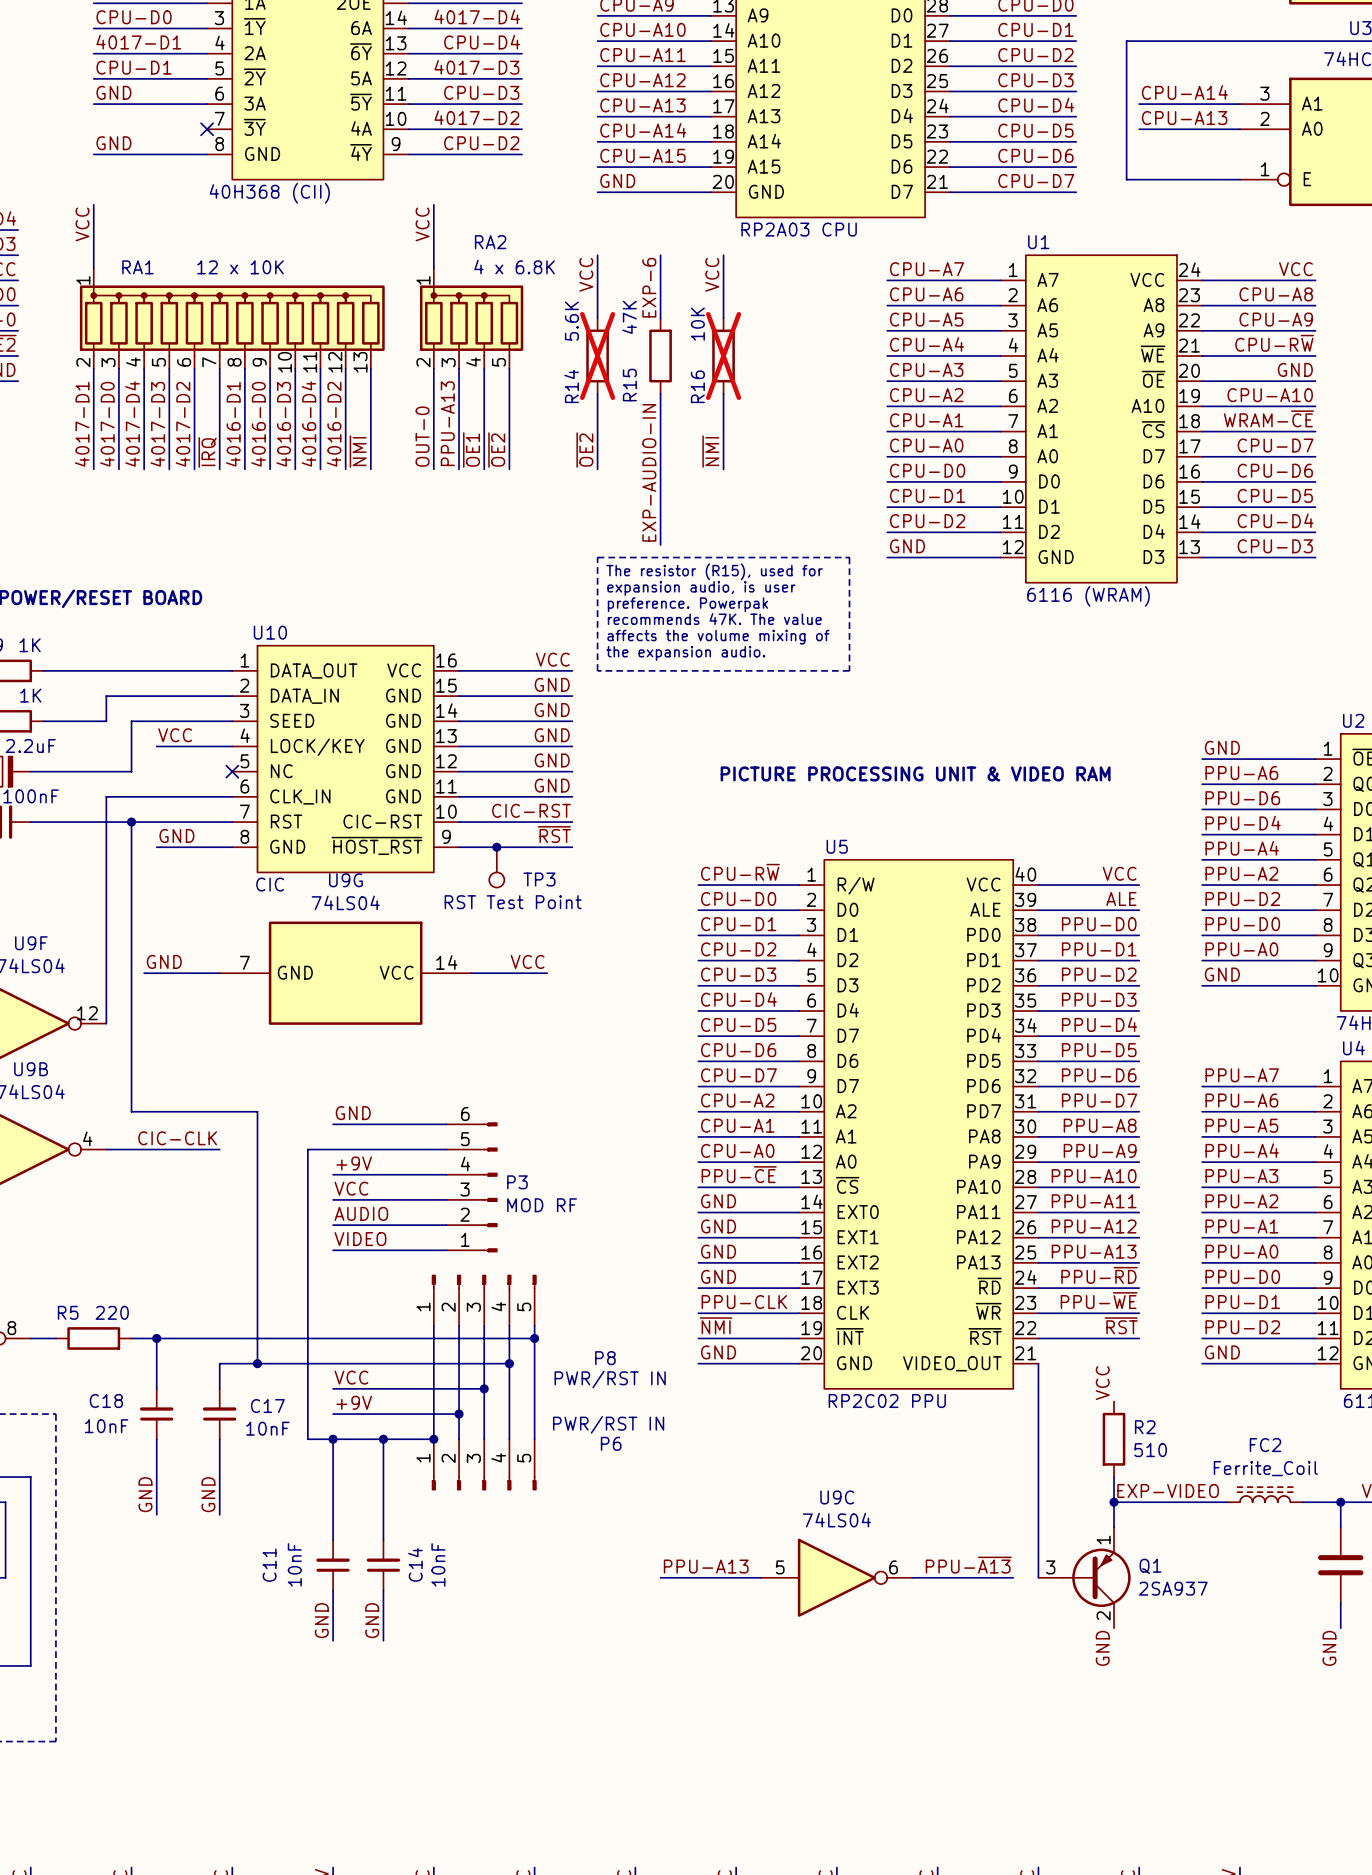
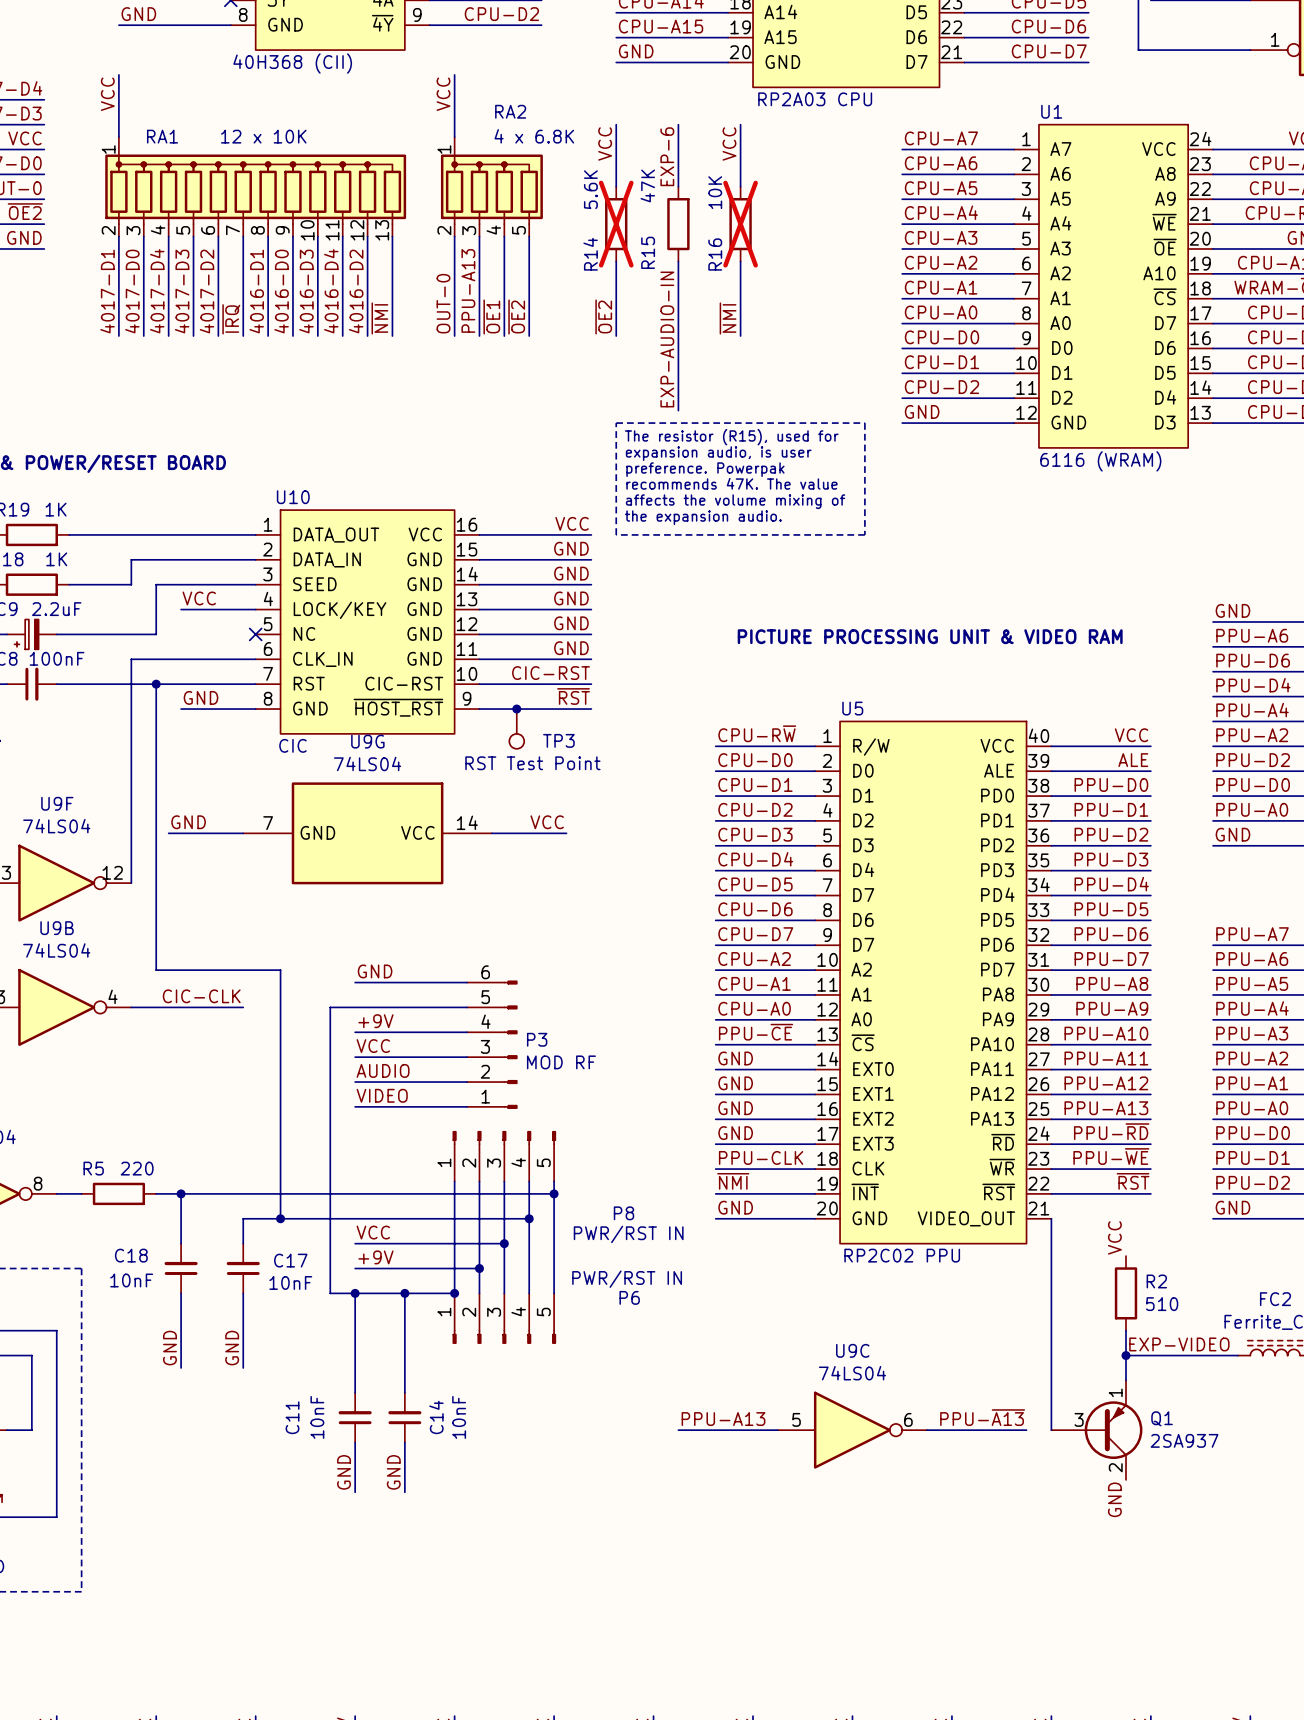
Q1 symbol: [1038, 1527, 1131, 1629] -> [1051, 1380, 1143, 1480]

